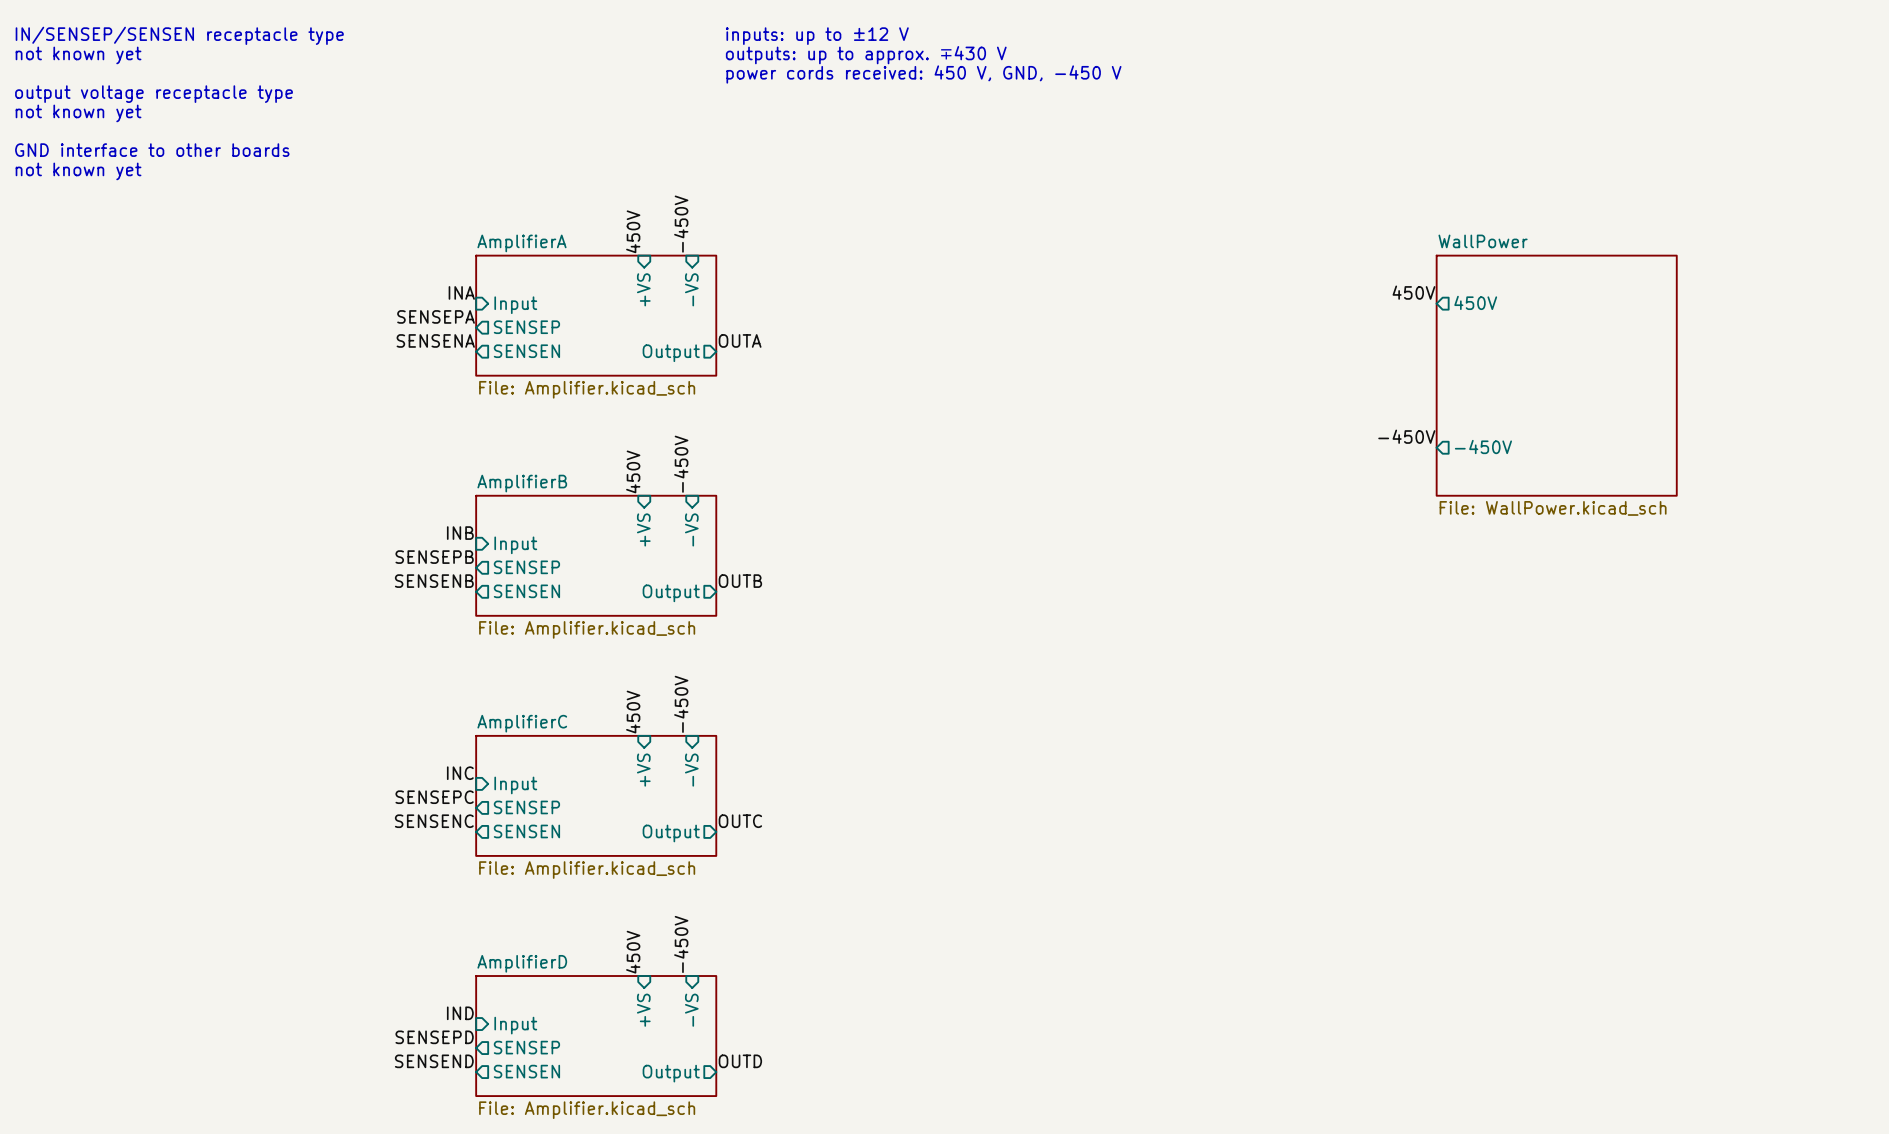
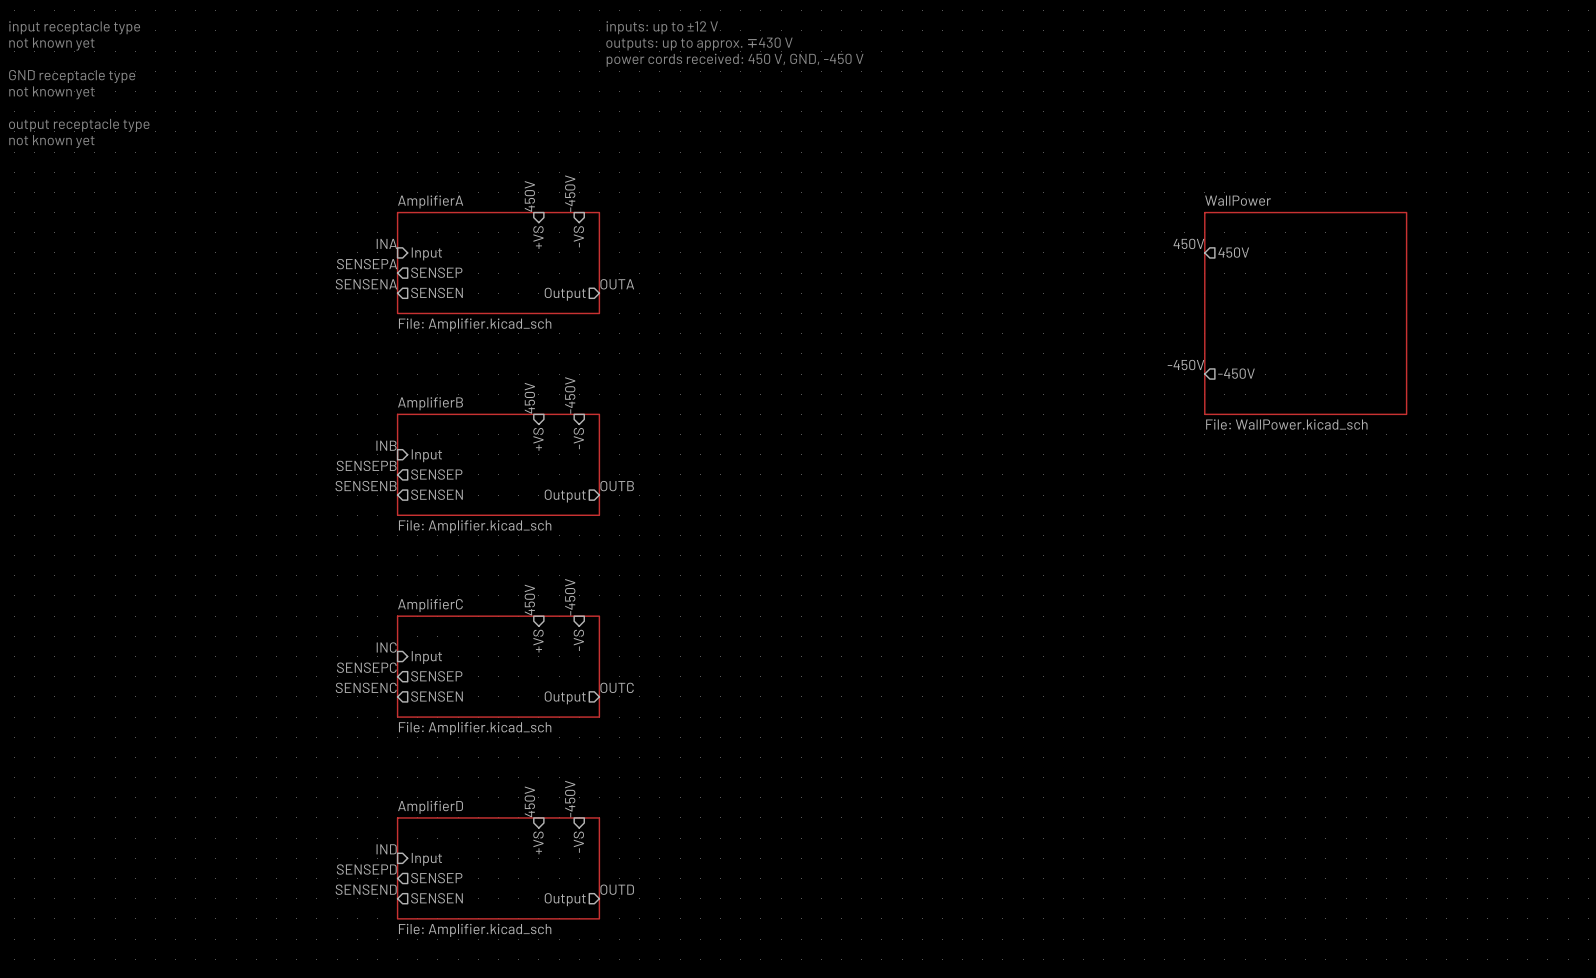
text: IN/SENSEP/SENSEN receptacle type (179, 35) -> input receptacle type (74, 27)
text: output voltage receptacle type (154, 94) -> GND receptacle type (72, 76)
text: GND interface to other boards (152, 150) -> output receptacle type (79, 125)

